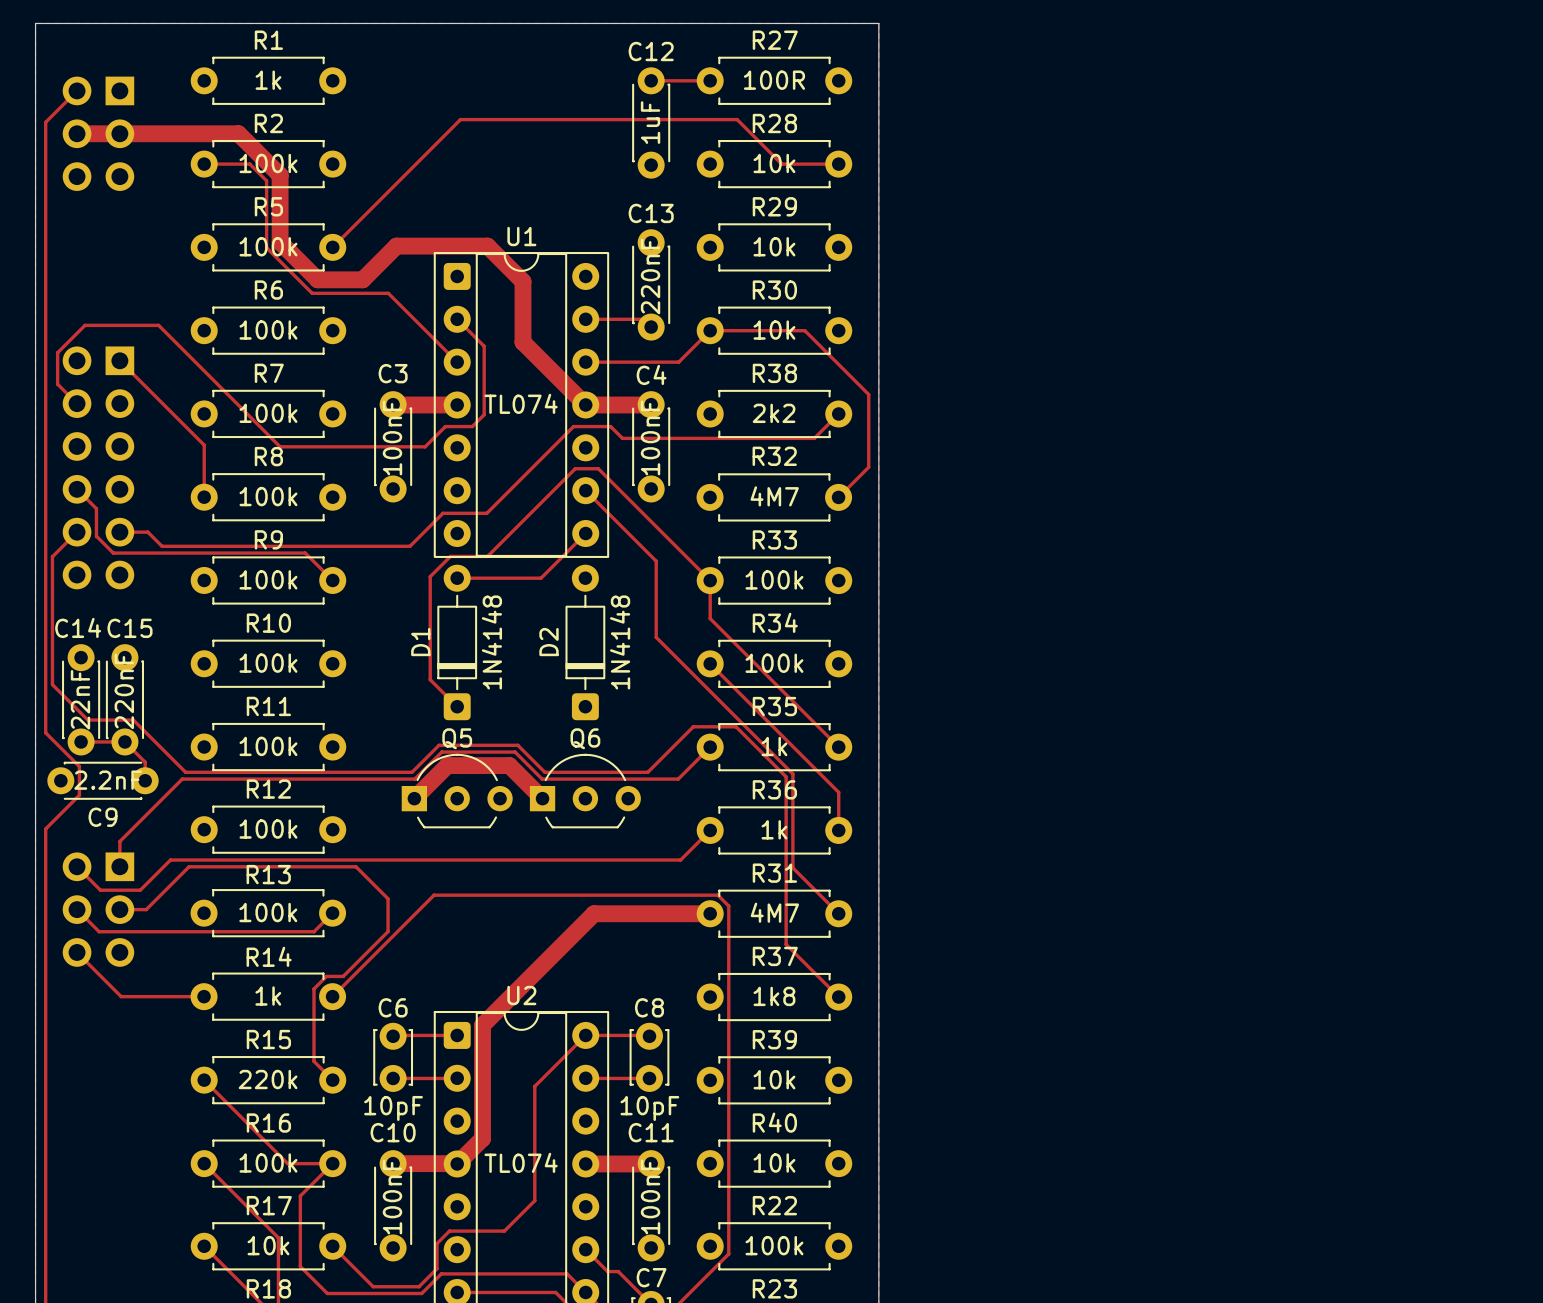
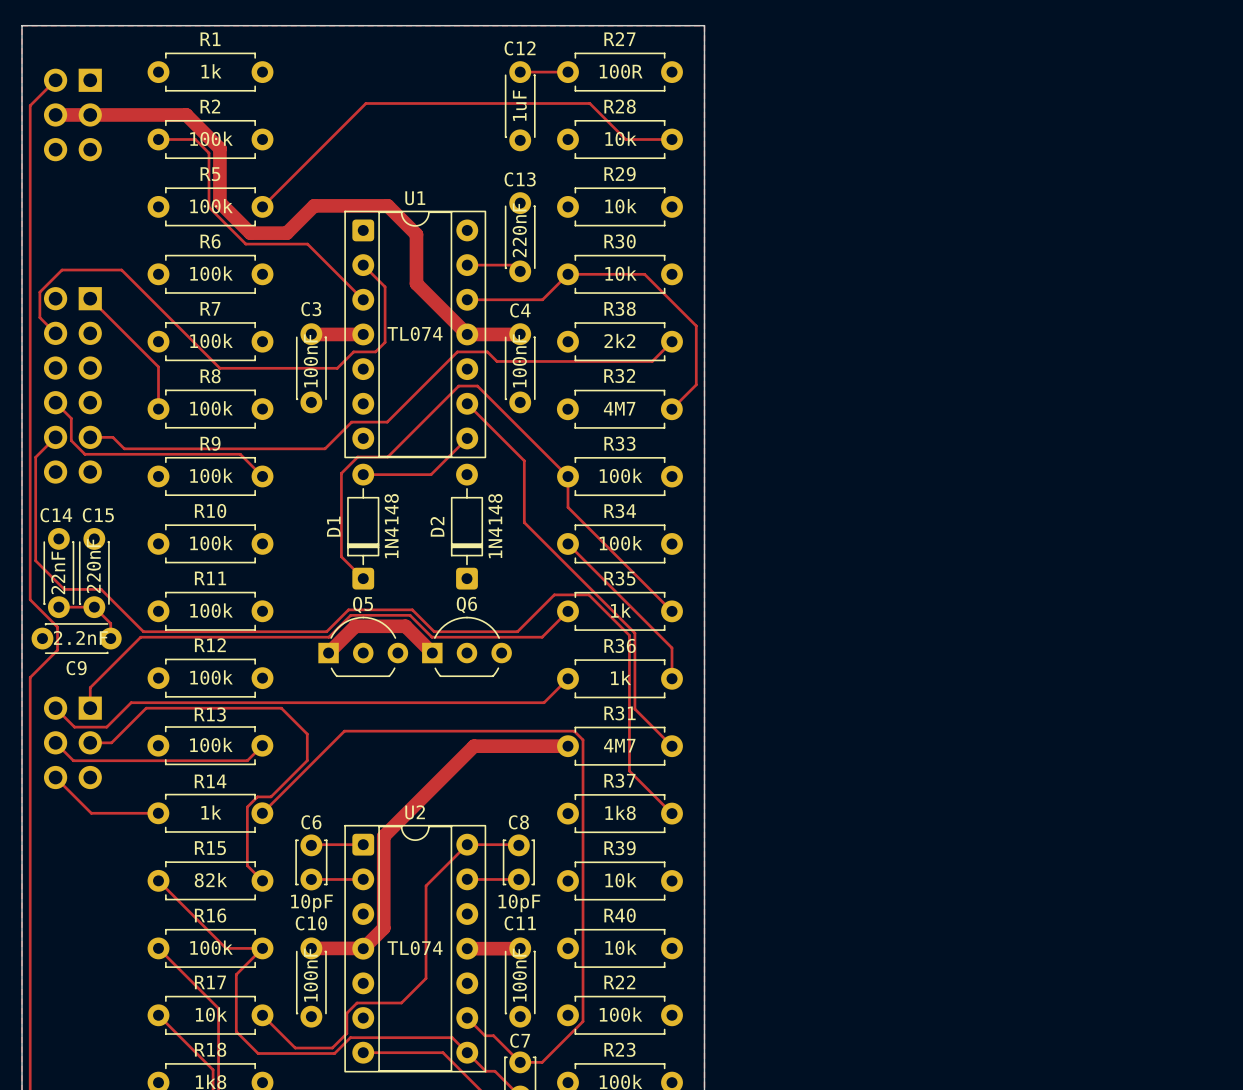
R15 value: 220k (268, 1079) -> 82k (210, 880)

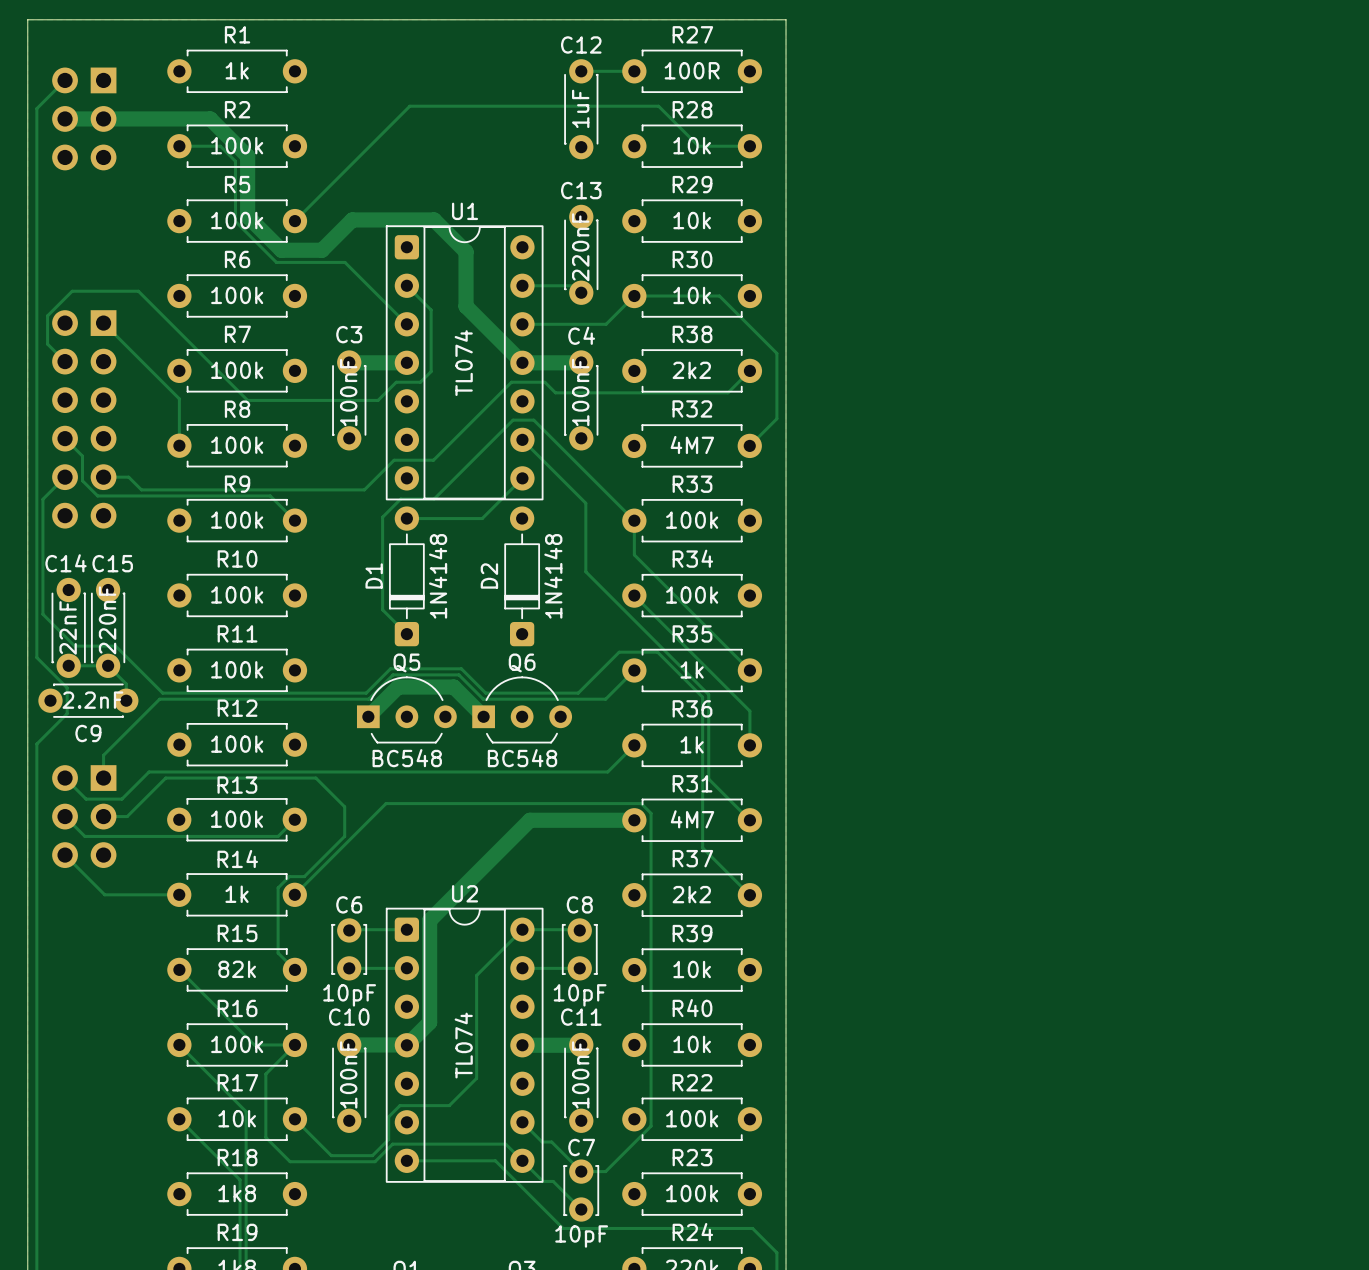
U1 value rotation: 0° (415, 333) -> 90° counterclockwise (463, 363)
Q5 value: none -> BC548 (407, 758)
Q6 value: none -> BC548 (522, 758)
R37 value: 1k8 (620, 812) -> 2k2 (691, 894)
U2 value rotation: 0° (415, 948) -> 90° counterclockwise (463, 1045)

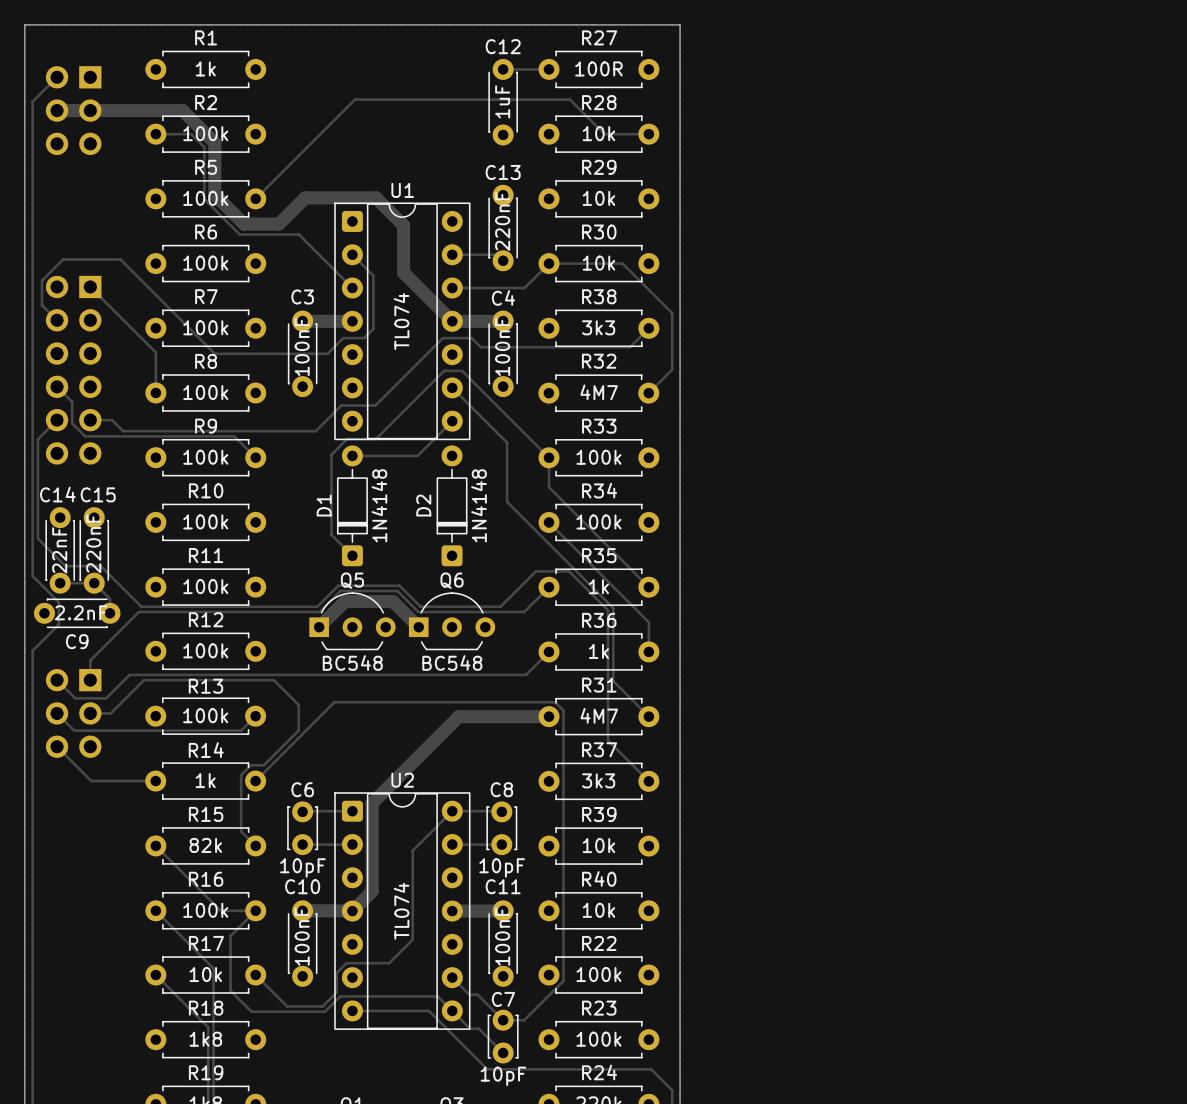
R38 value: 2k2 (691, 370) -> 3k3 (598, 327)
R37 value: 2k2 (691, 894) -> 3k3 (598, 780)

